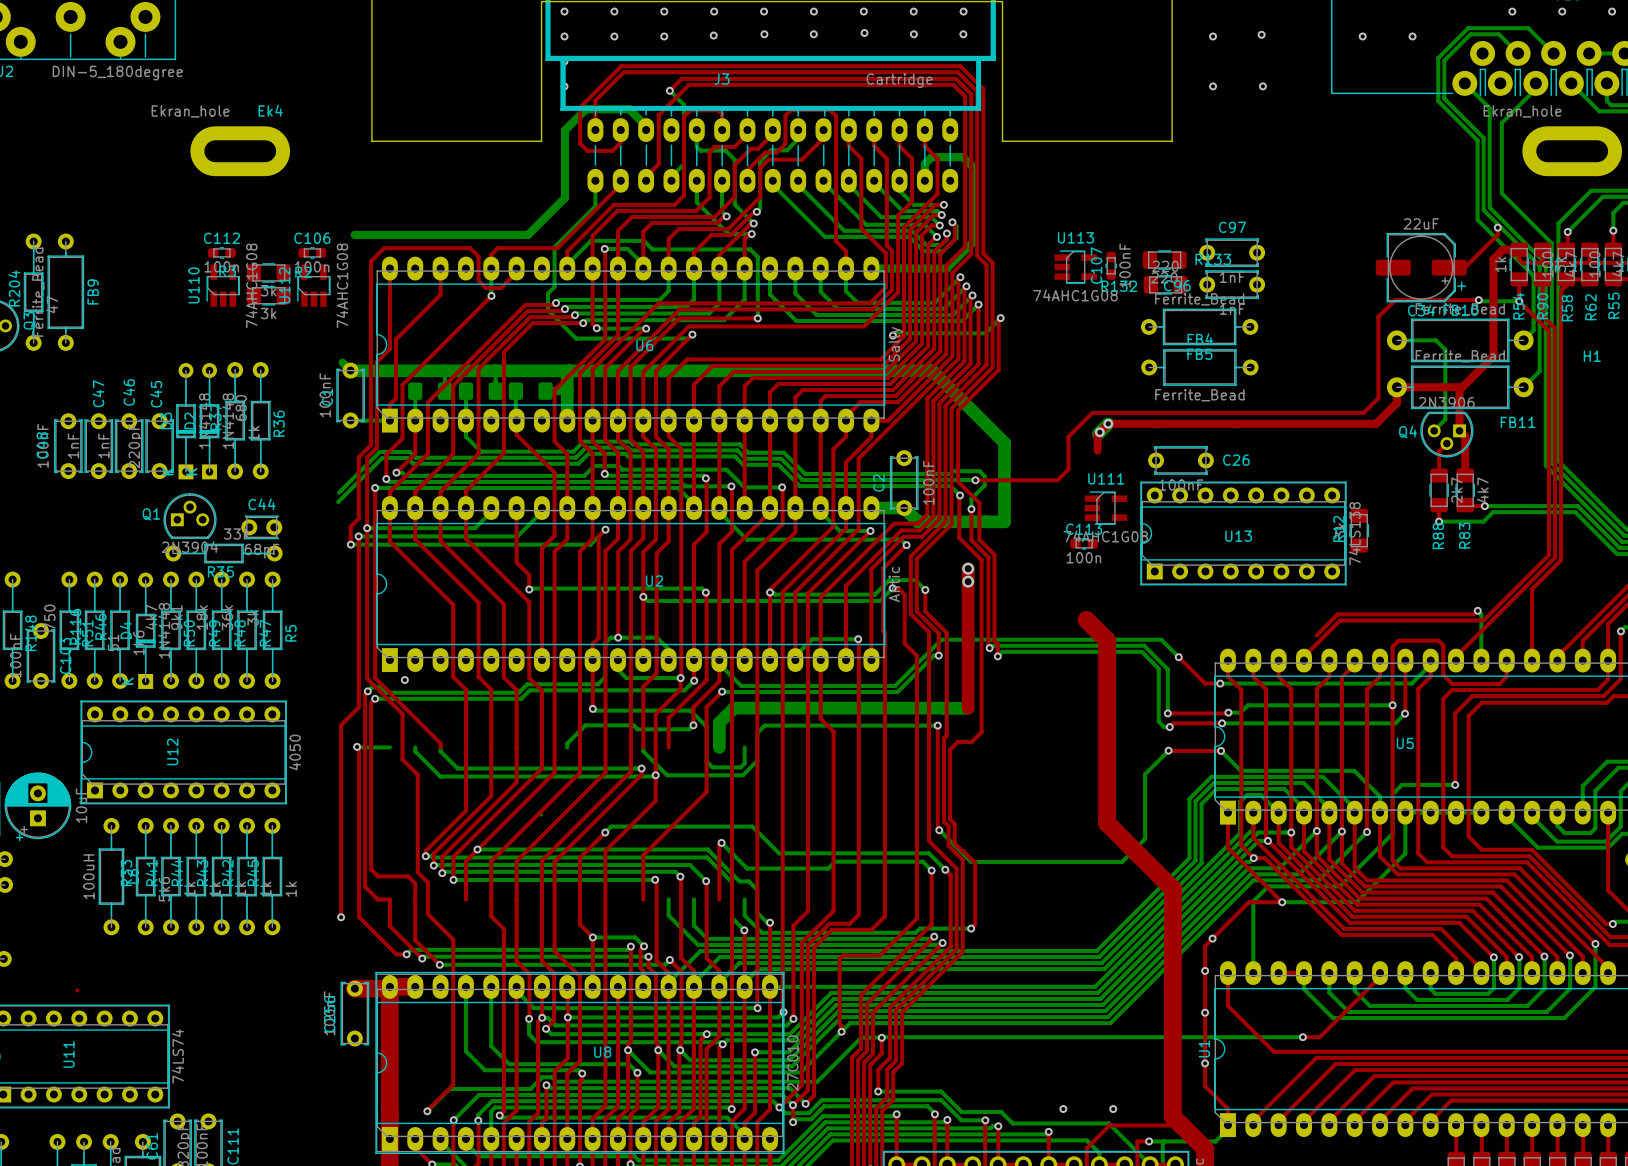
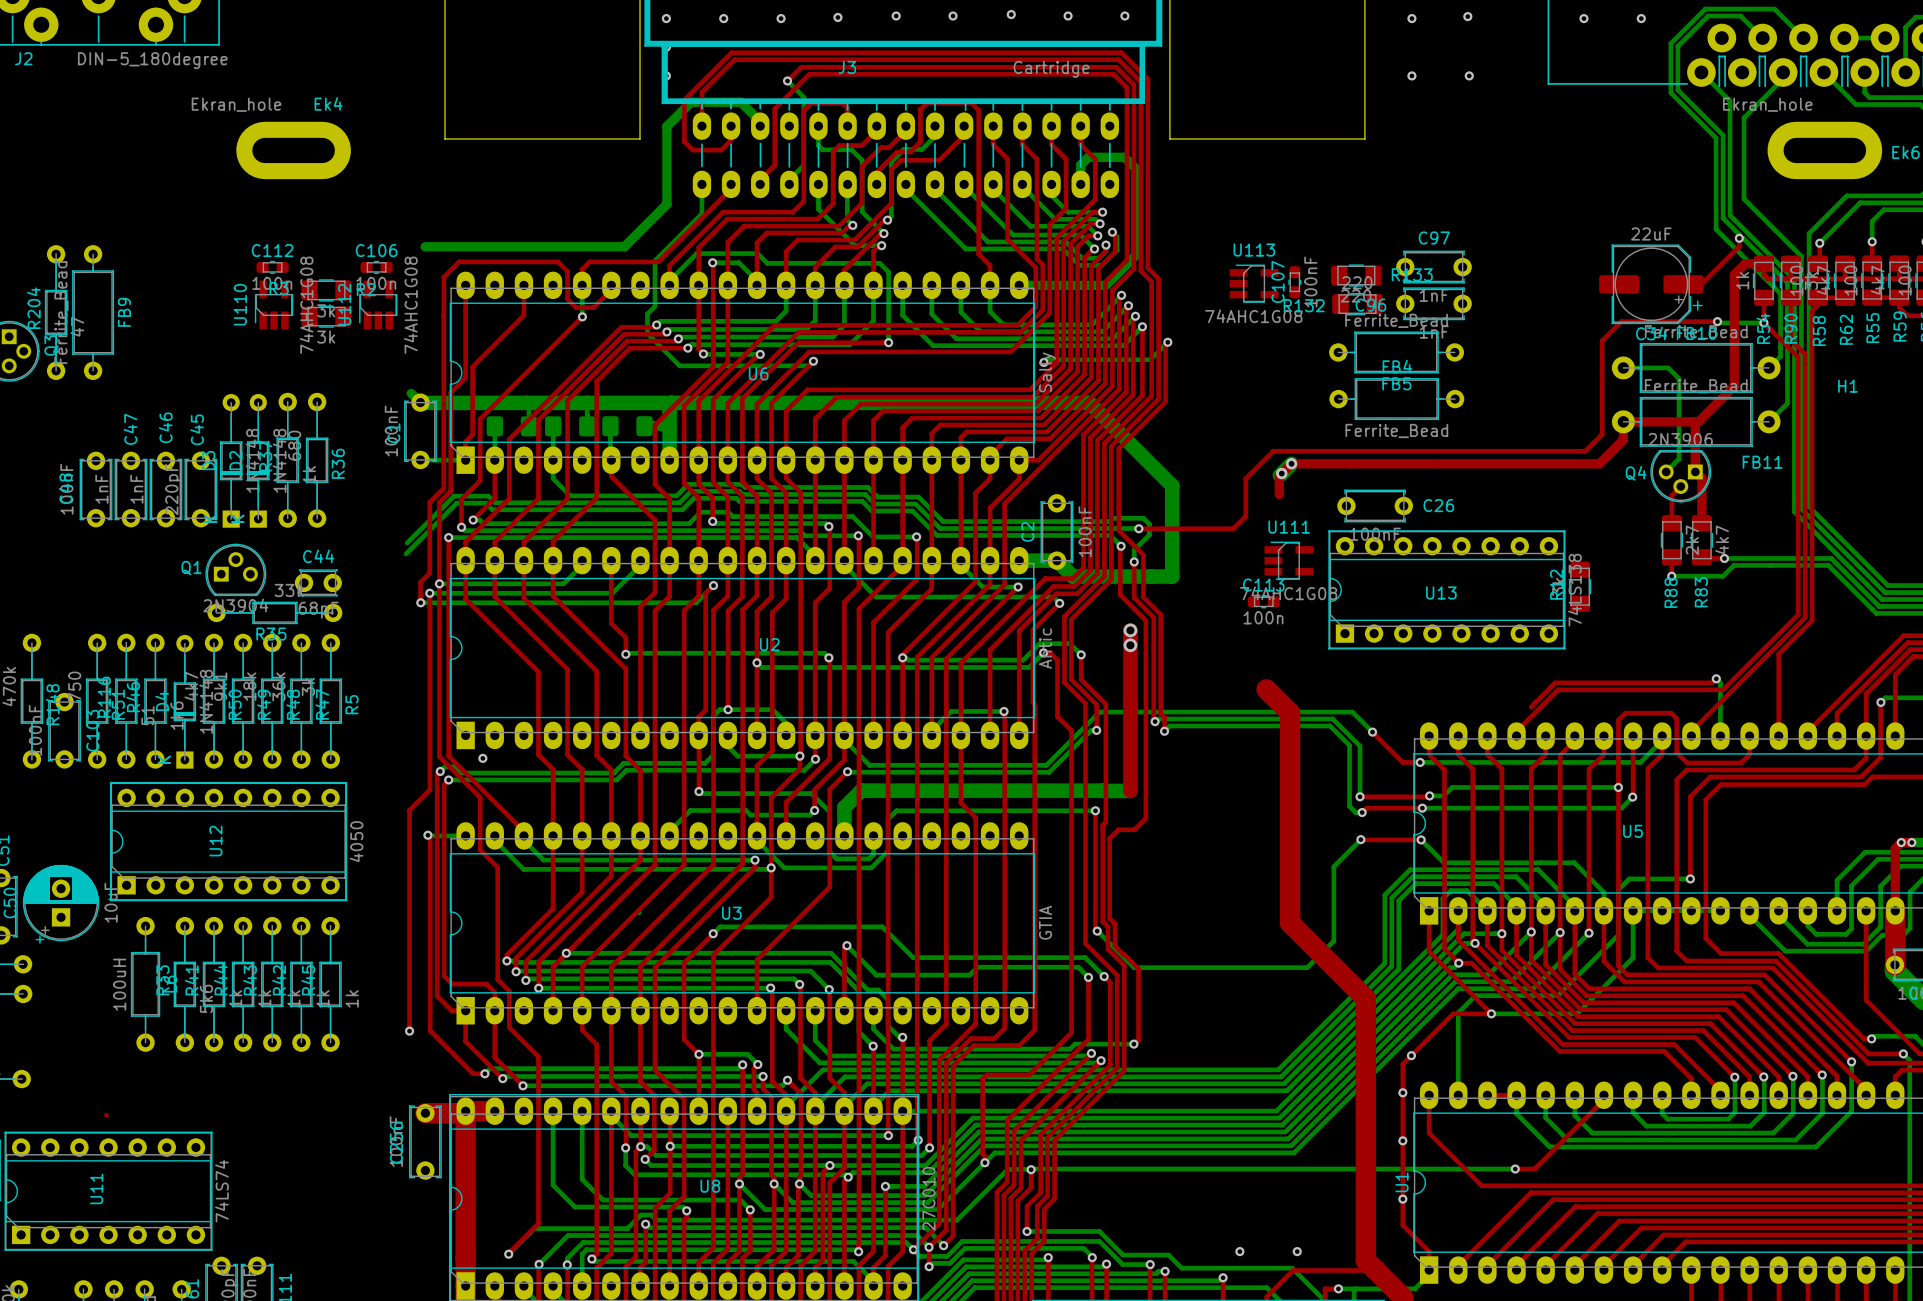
U3: none -> GTIA (742, 923)

